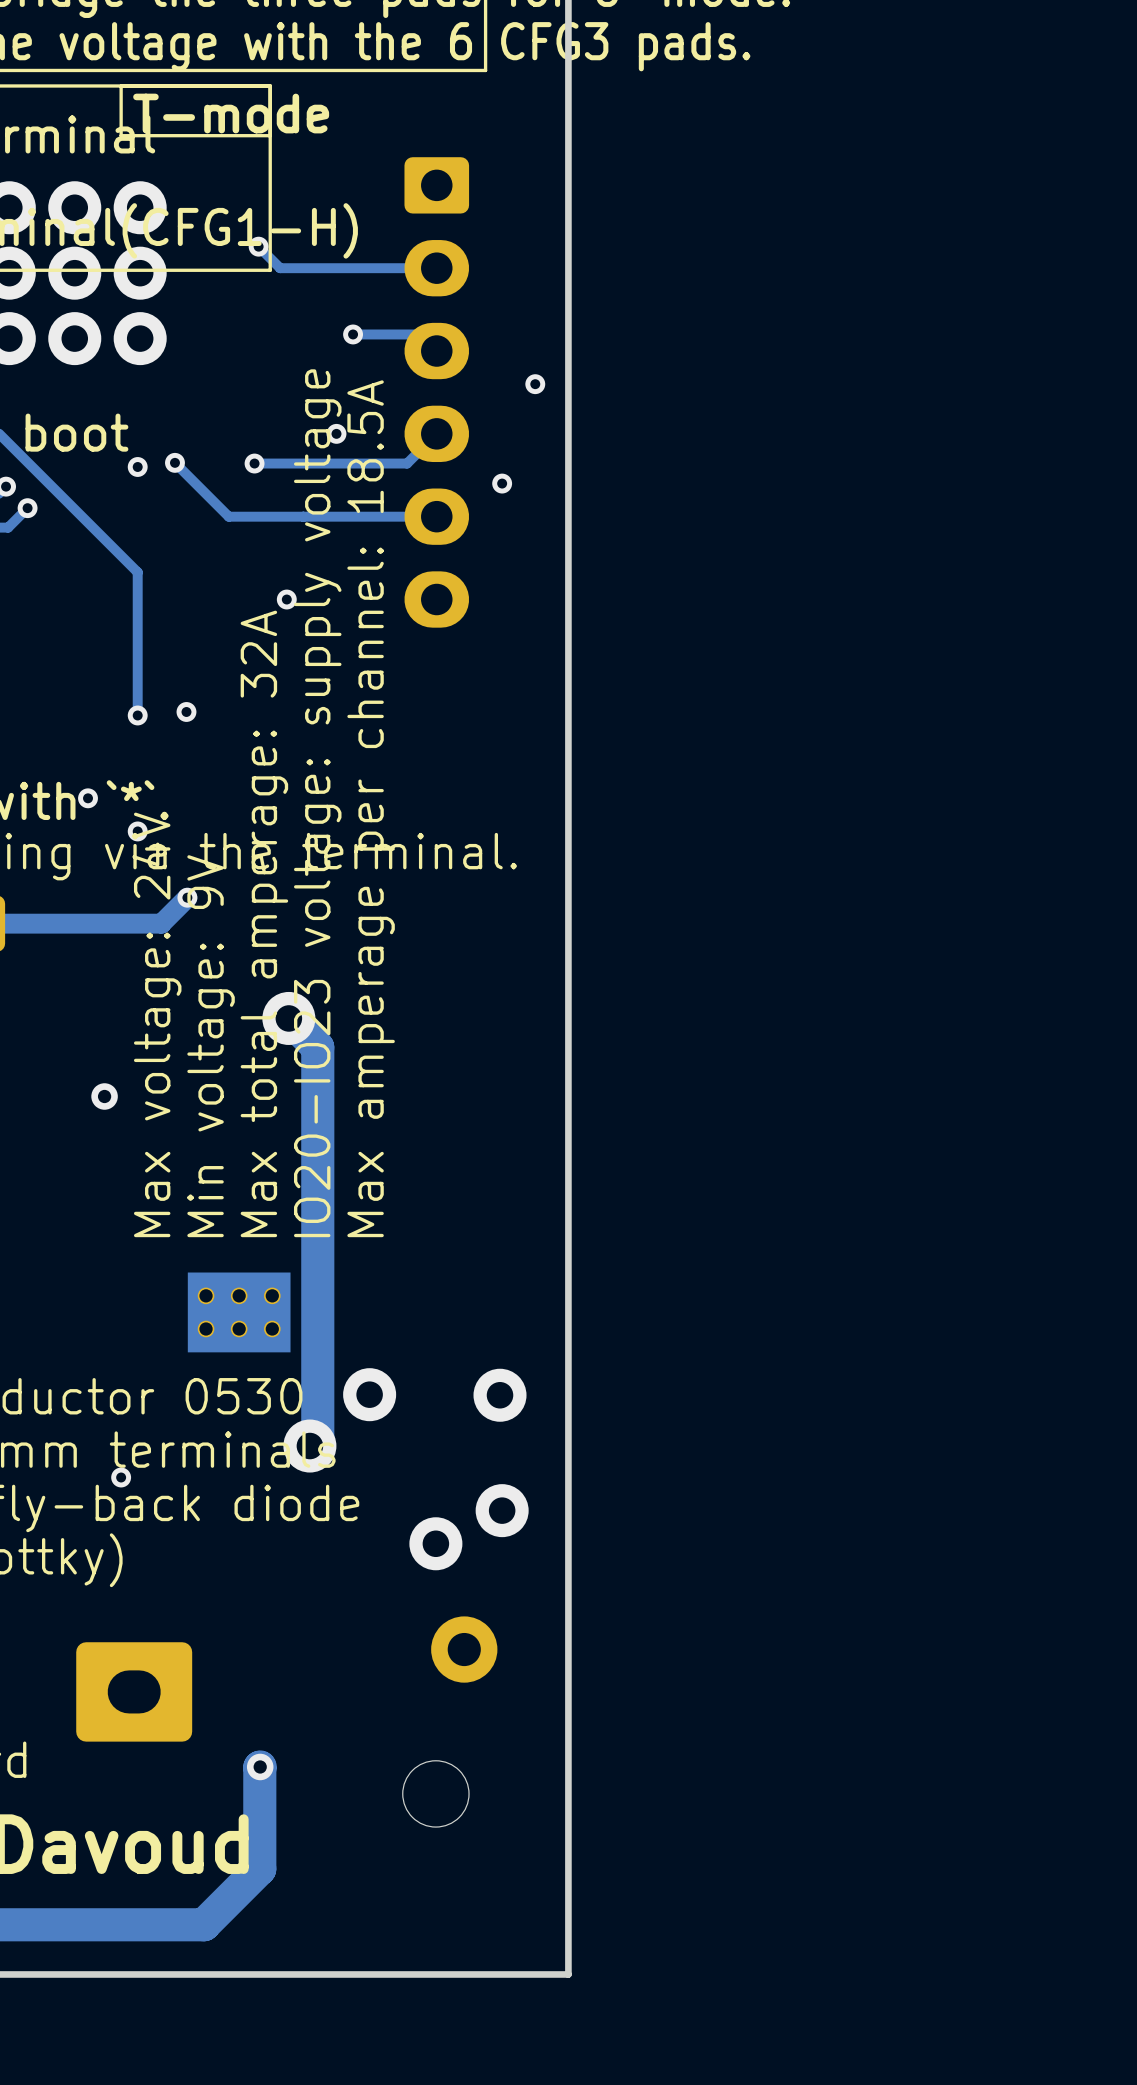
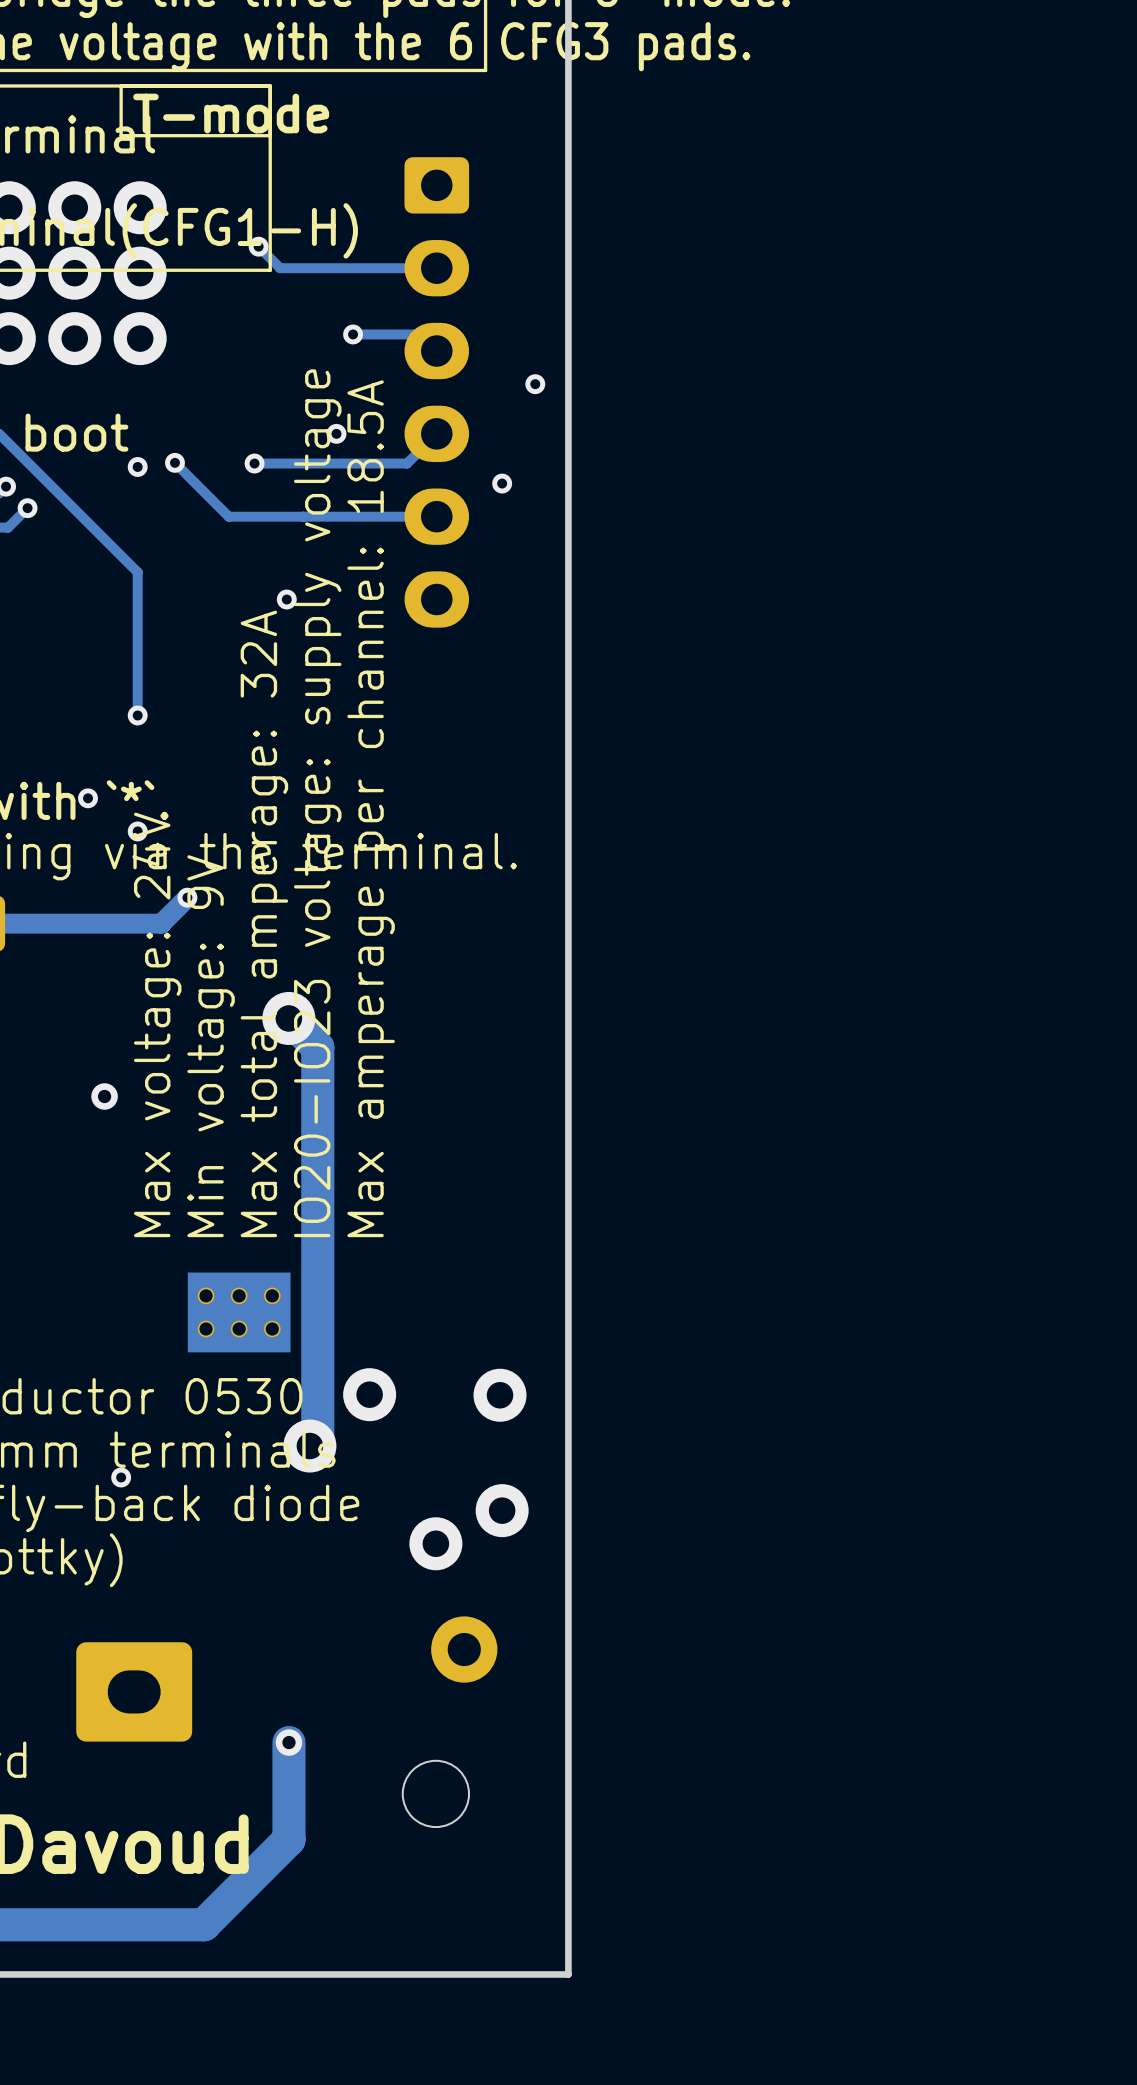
via: (186, 711) -> none
via position: (260, 1766) -> (288, 1742)
track: (259, 1767) (259, 1868) -> (288, 1742) (288, 1839) (259, 1868)

